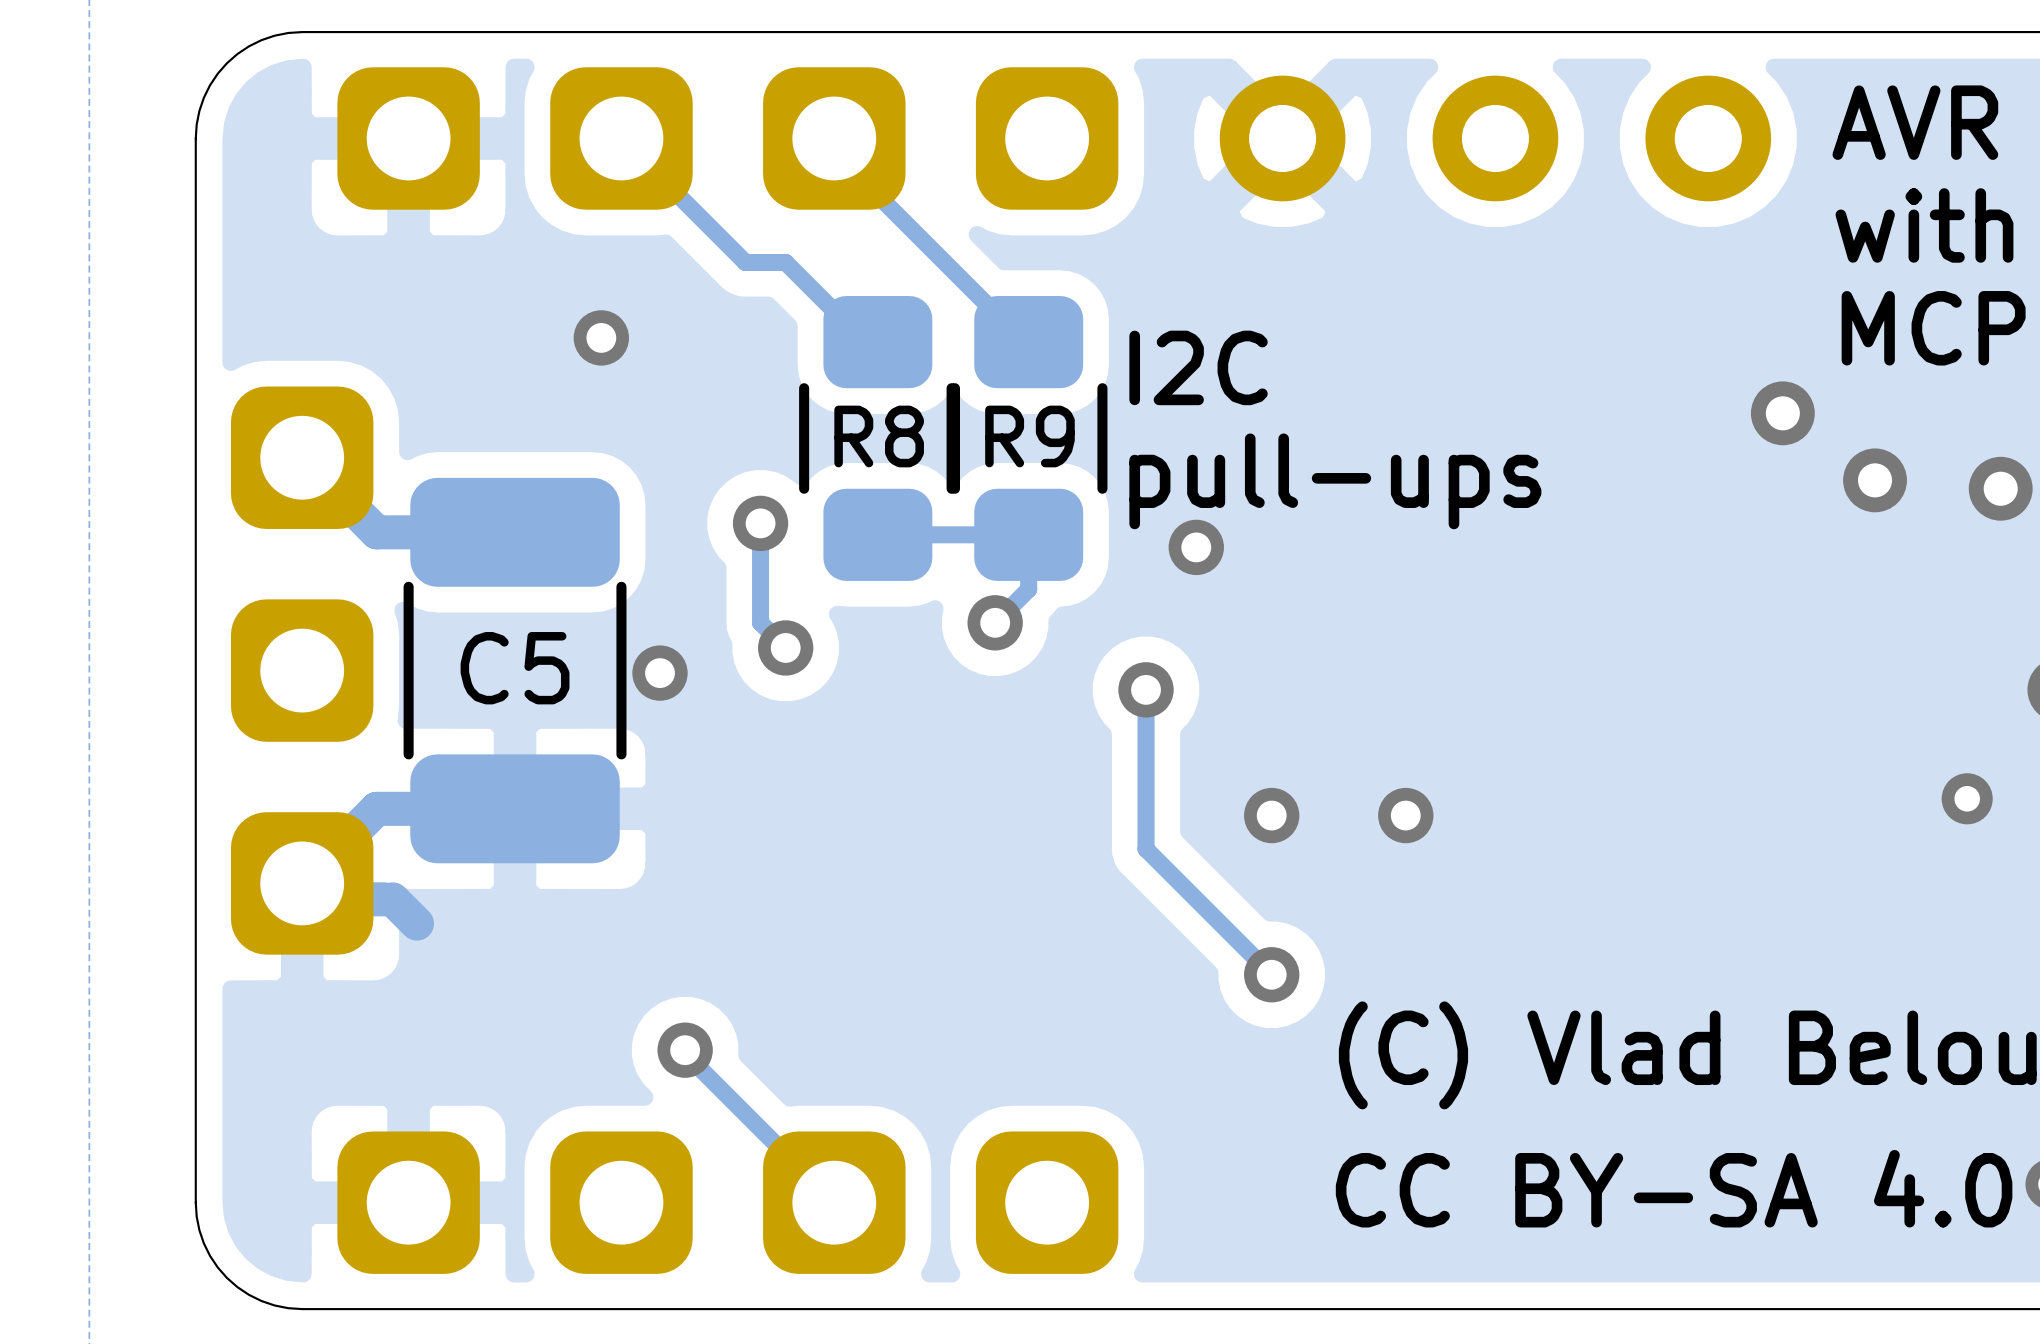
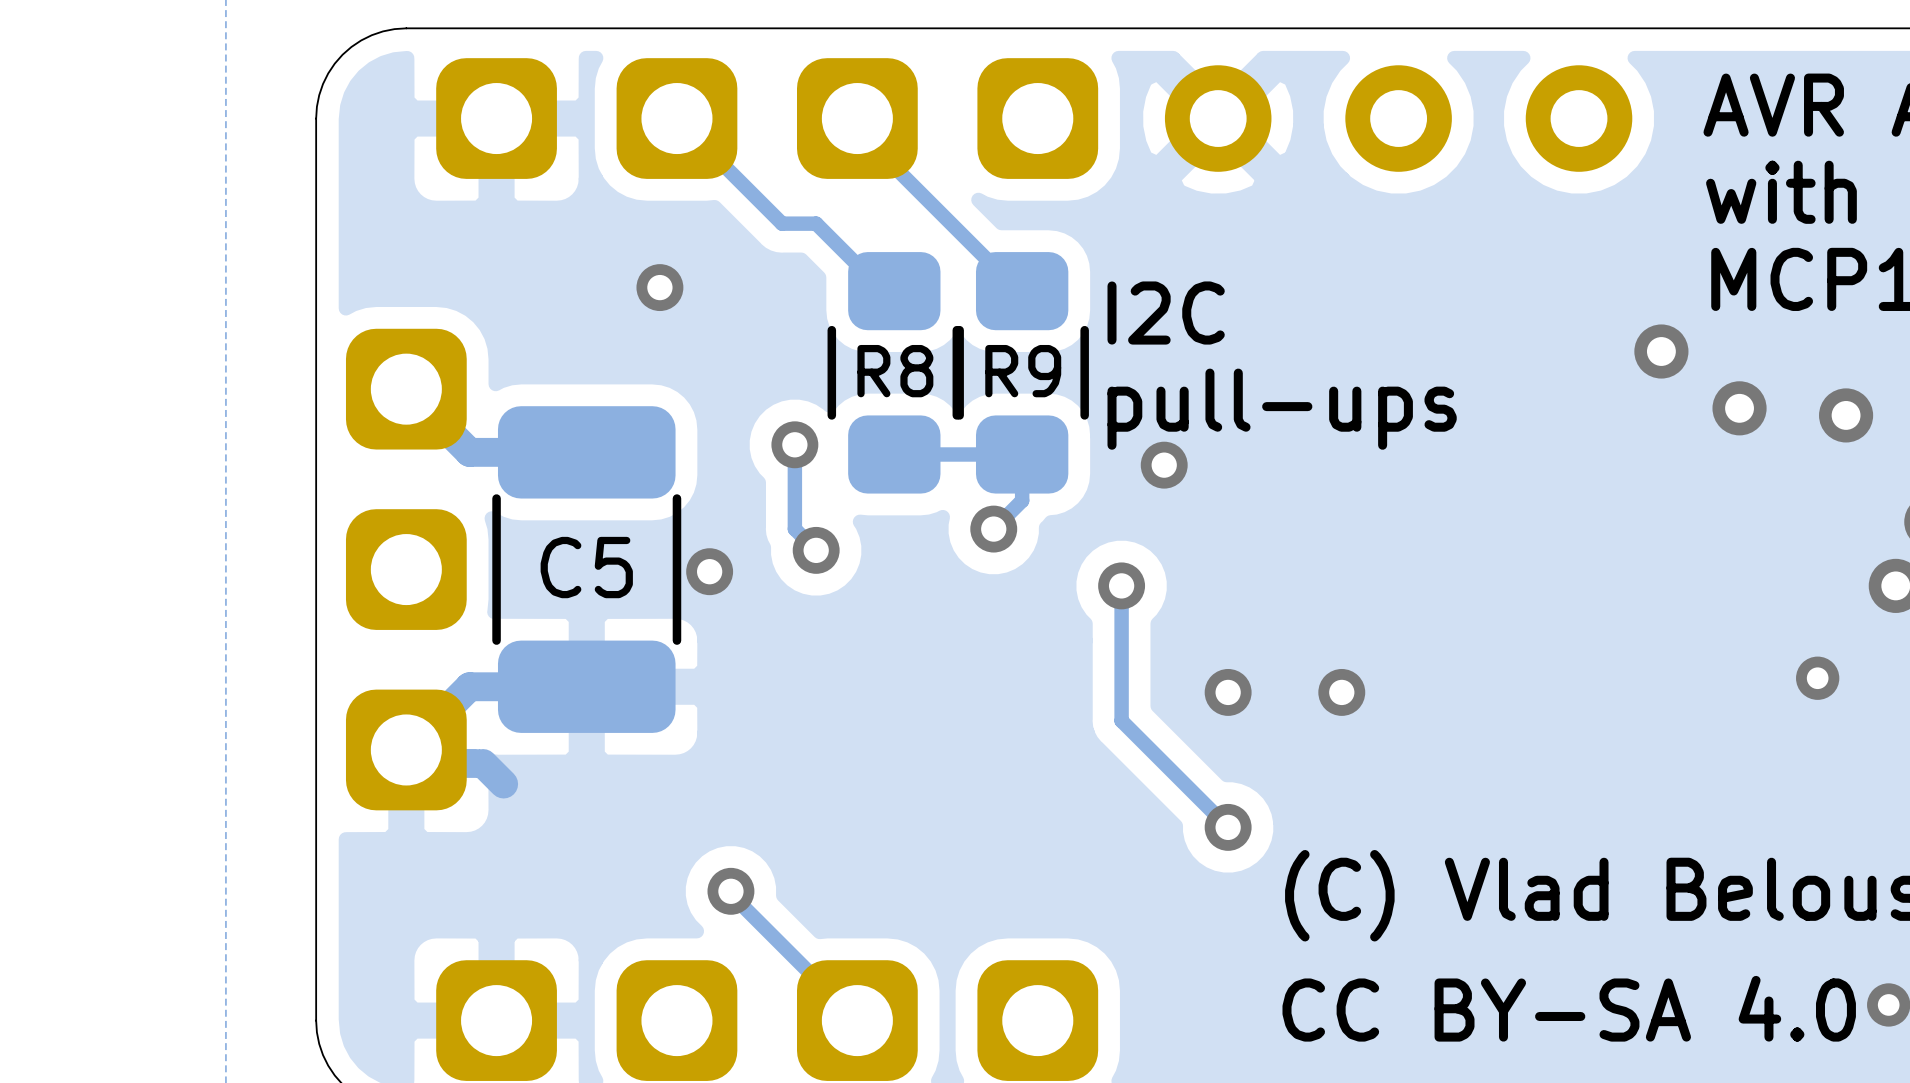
part position: (1282, 138) -> (1218, 118)
part position: (1495, 138) -> (1398, 118)
part position: (1708, 138) -> (1579, 118)

